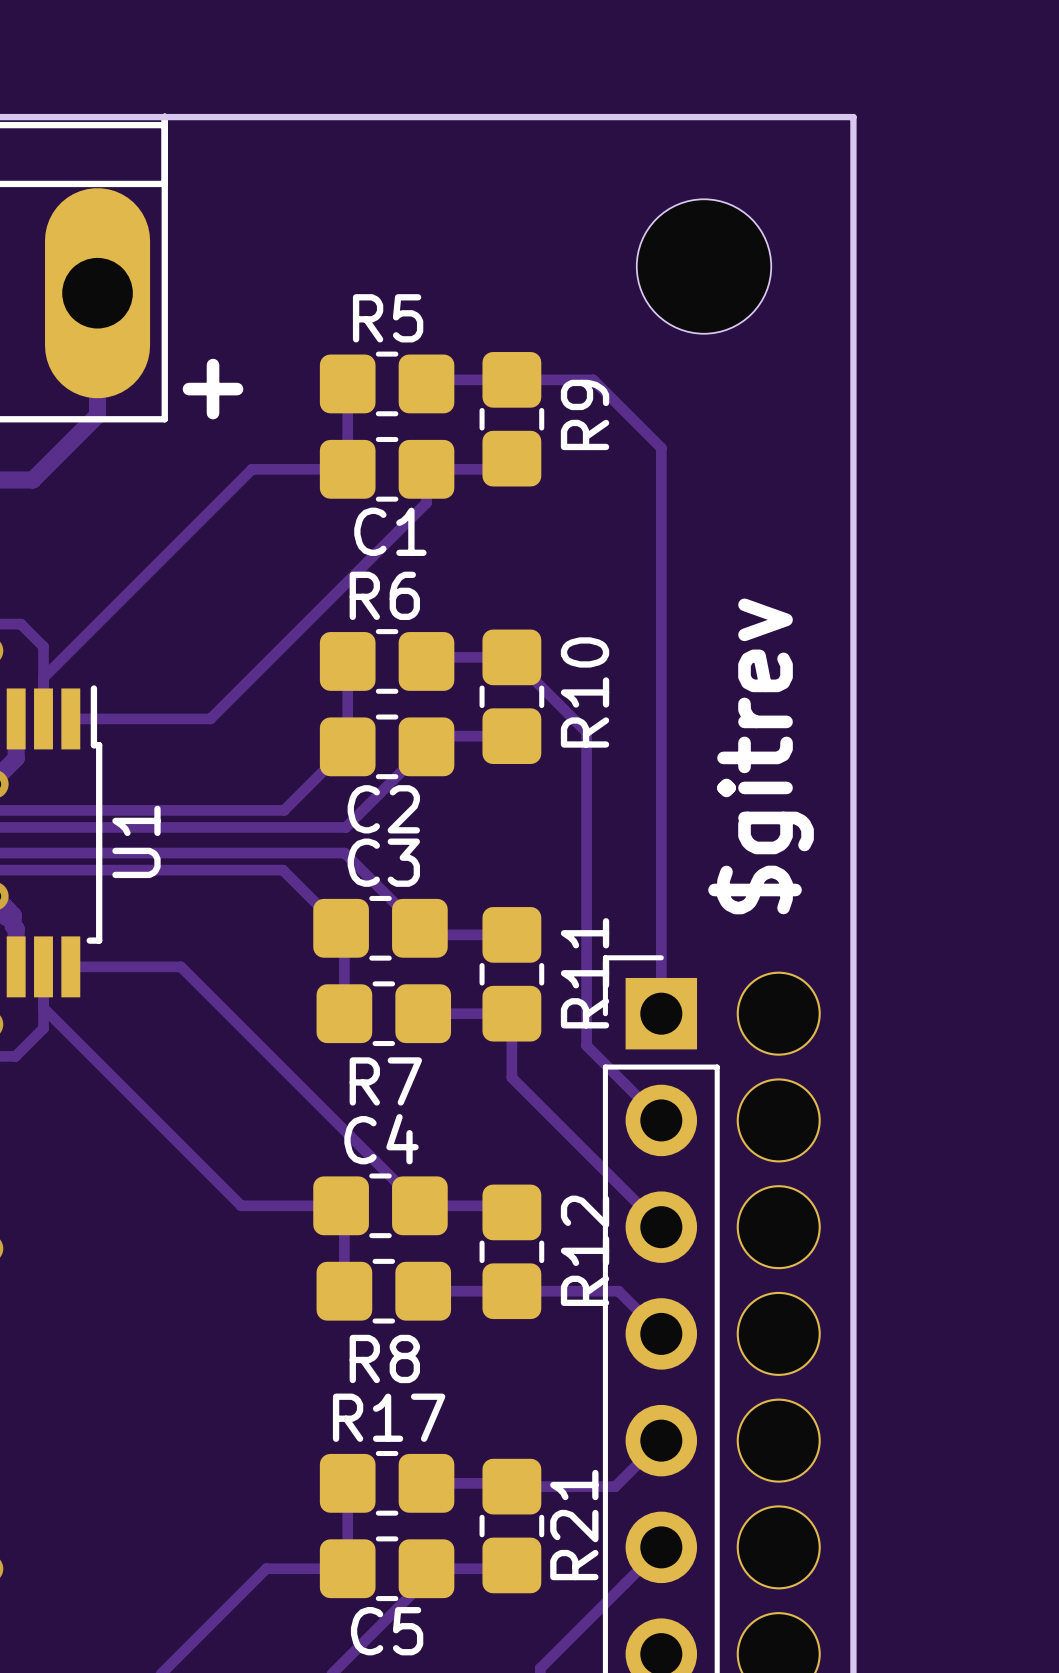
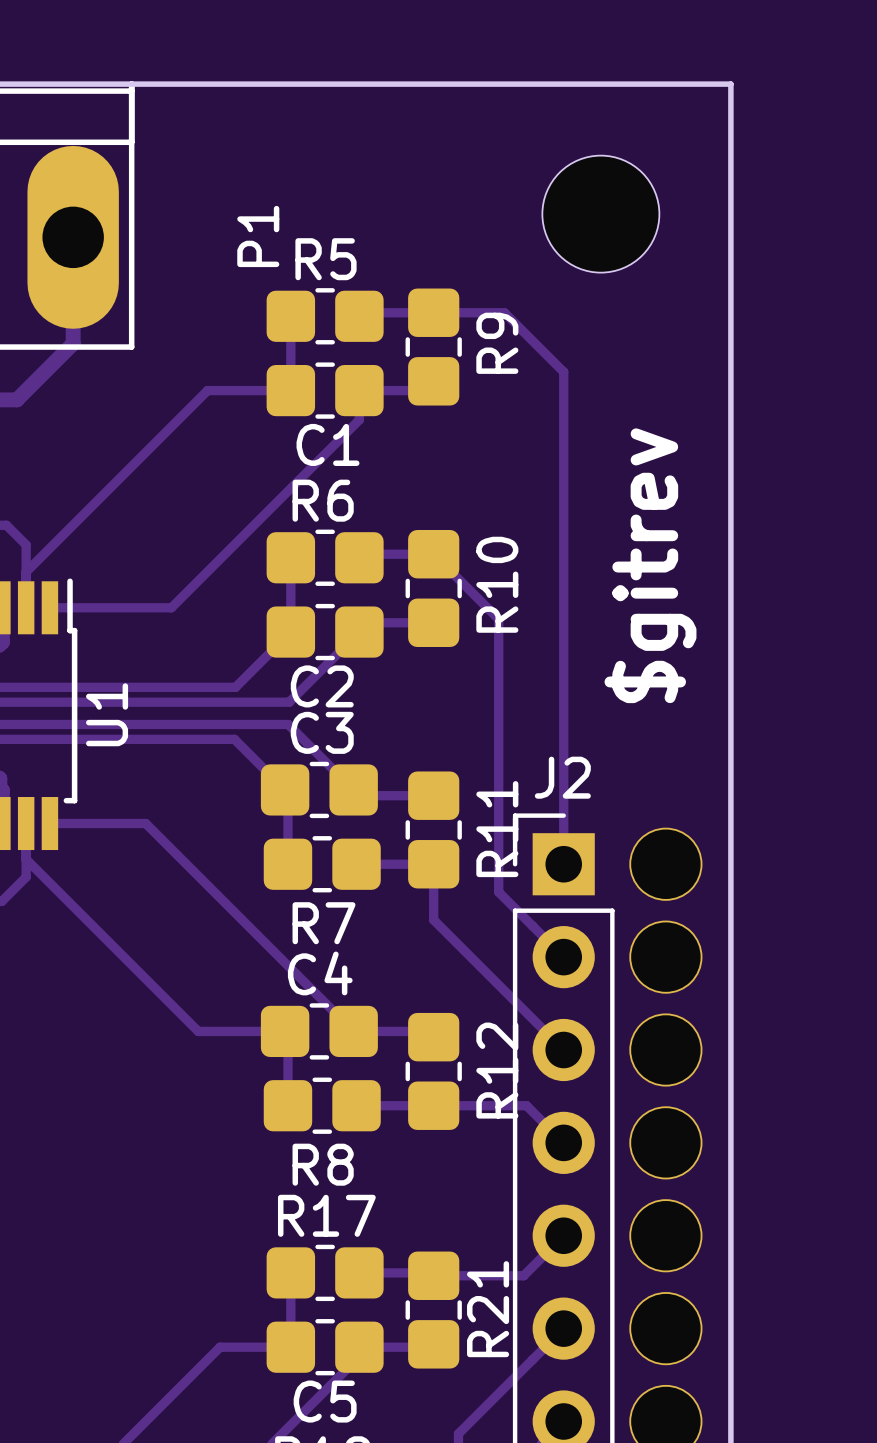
P1 name: none -> P1 (258, 236)
text: + (213, 389) -> none
text position: $gitrev (761, 756) -> $gitrev (650, 565)
J2 name: none -> J2 (562, 777)

